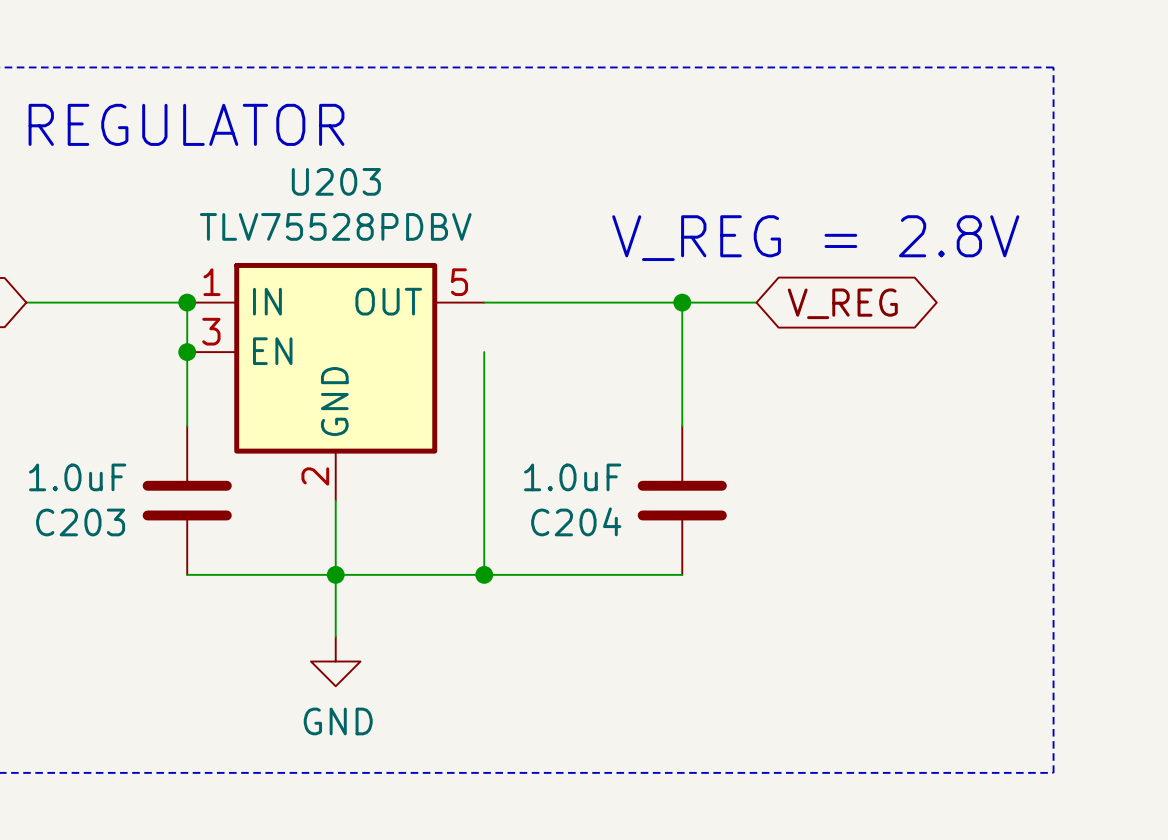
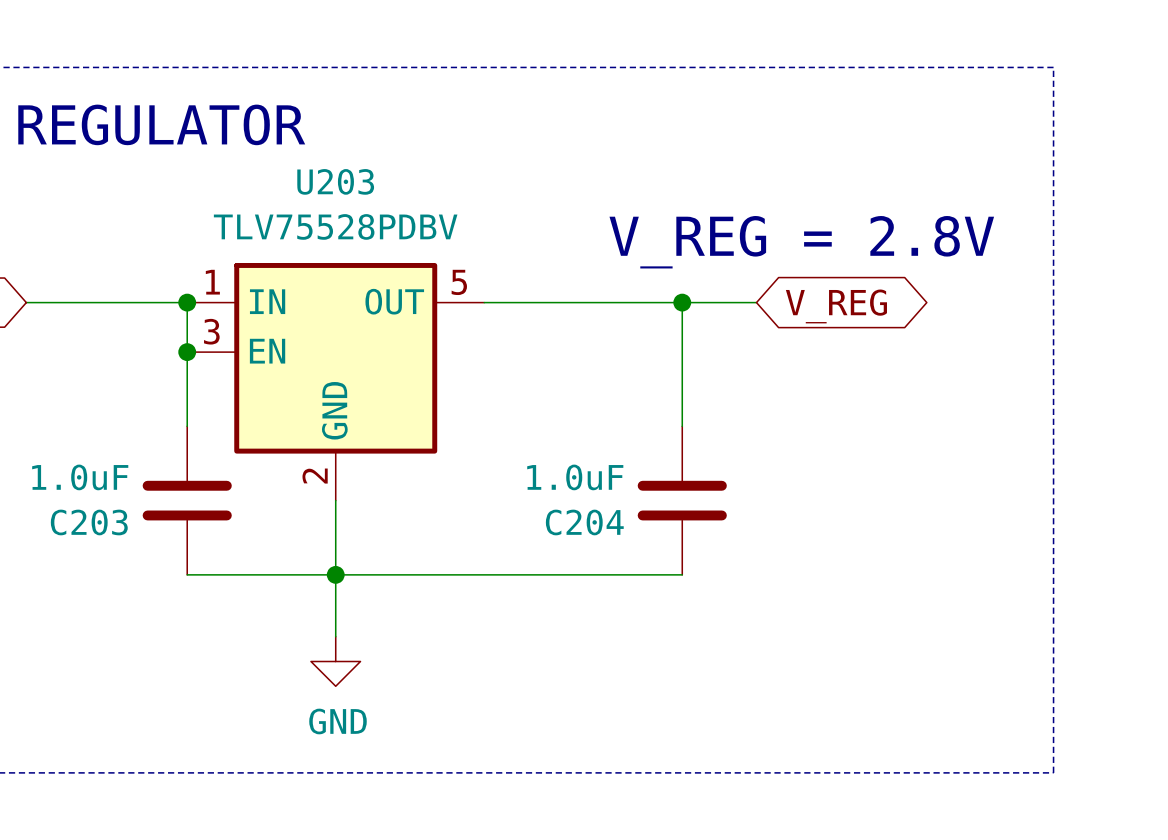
wire: (484, 352) (484, 574) -> none
junction: (484, 574) -> none

